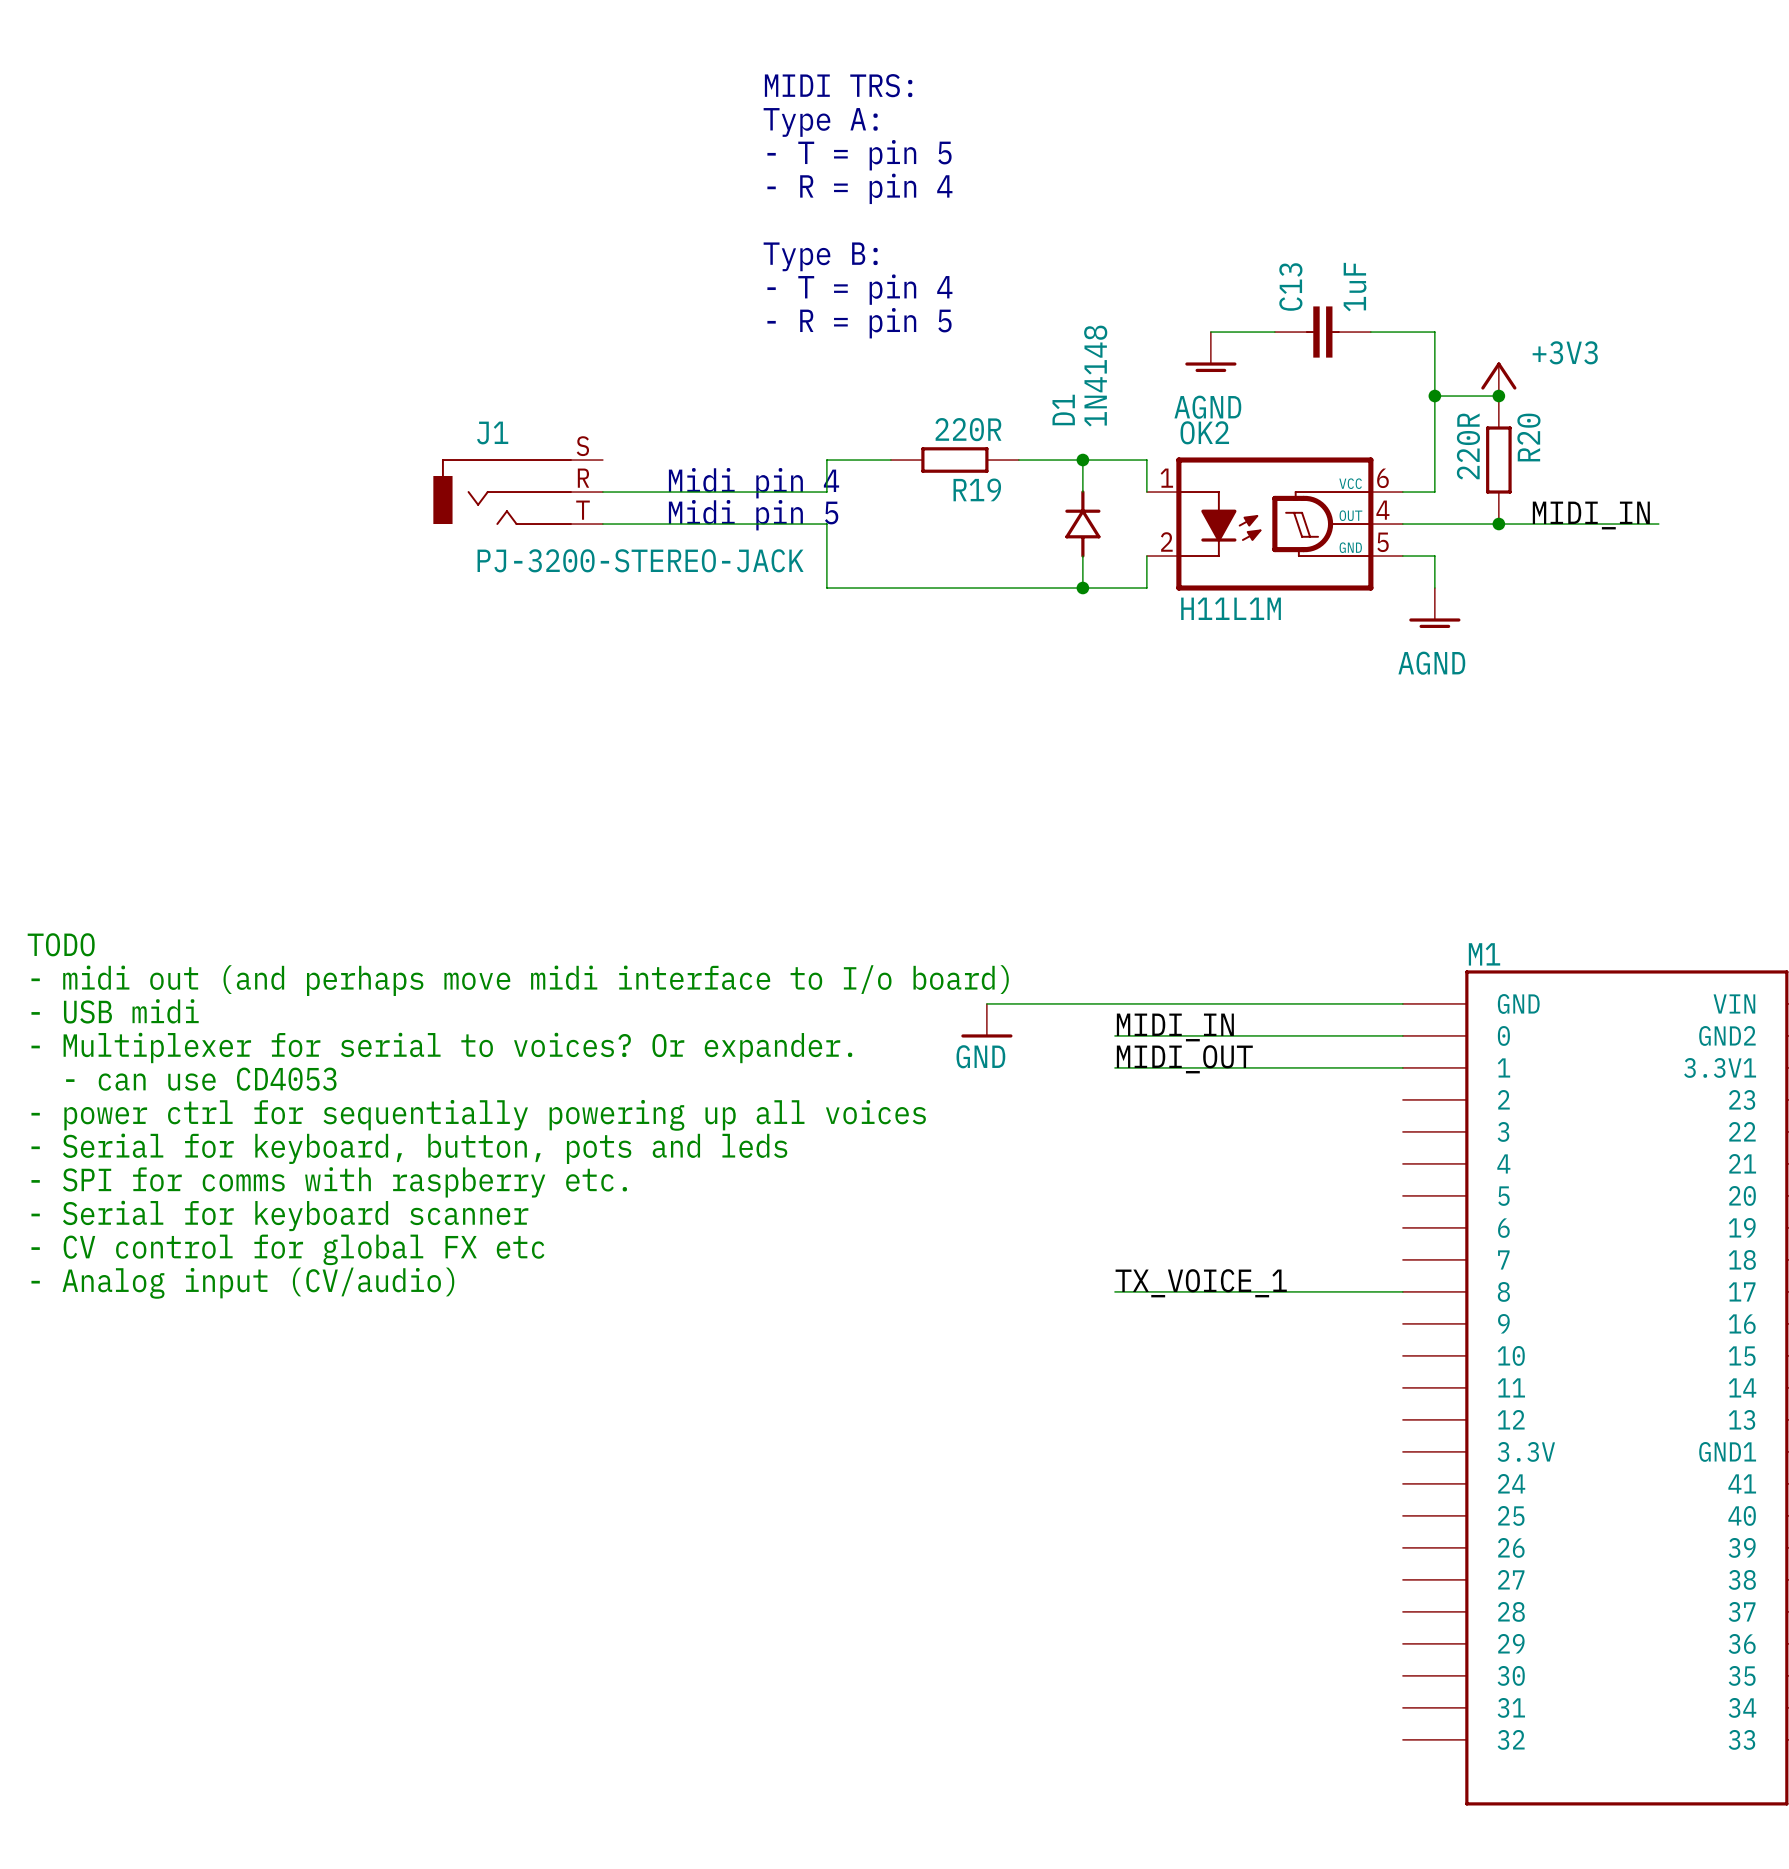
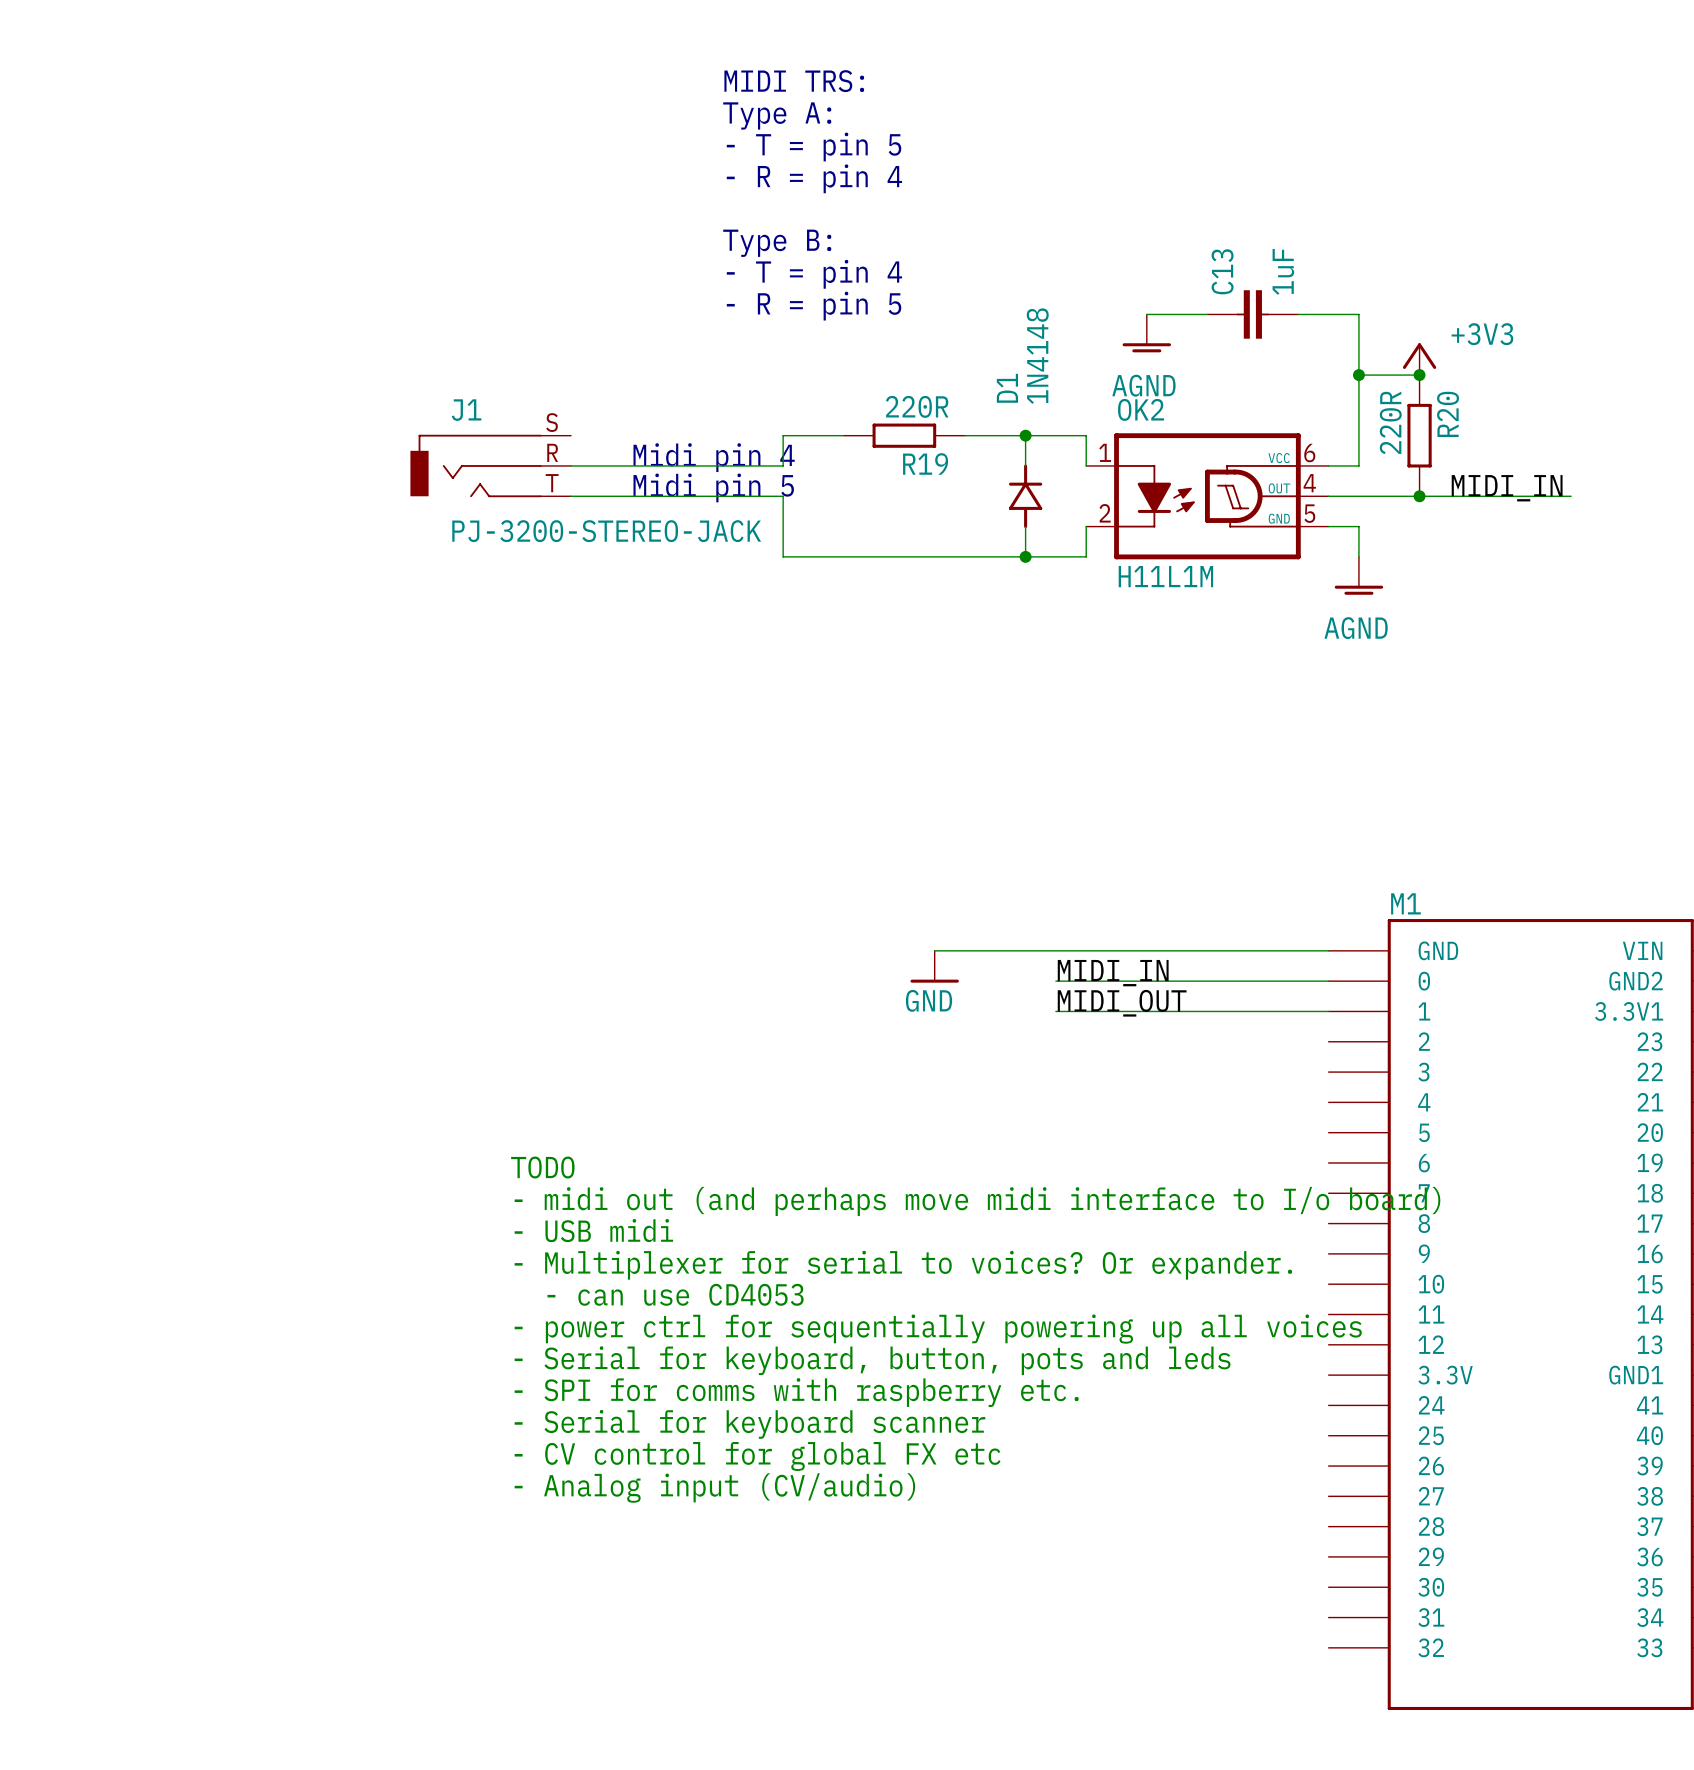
text: TODO (61, 944) -> none
text: - midi out (and perhaps move midi interface to I/o board) (520, 980) -> none
text: - USB midi (115, 1011) -> none
text: - Multiplexer for serial to voices? Or expander. (441, 1047) -> none
text: - can use CD4053 (201, 1079) -> none
text: - power ctrl for sequentially powering up all voices (478, 1115) -> none
text: - Serial for keyboard, button, pots and leds (409, 1148) -> none
text: - SPI for comms with raspberry etc. (329, 1182) -> none
text: - Serial for keyboard scanner (279, 1215) -> none
text: none -> TODO (542, 1167)
text: - CV control for global FX etc (287, 1249) -> none
text: none -> - midi out (and perhaps move midi interface to I/o board) (977, 1201)
text: - Analog input (CV/audio) (242, 1283) -> none
label: TX_VOICE_1 (1201, 1283) -> none
wire: (1114, 1291) (1402, 1291) -> none
text: none -> - USB midi (593, 1230)
text: none -> - Multiplexer for serial to voices? Or expander. (903, 1265)
text: none -> - can use CD4053 (675, 1294)
text: none -> - power ctrl for sequentially powering up all voices (938, 1329)
text: none -> - Serial for keyboard, button, pots and leds (872, 1360)
text: none -> - SPI for comms with raspberry etc. (796, 1392)
text: none -> - Serial for keyboard scanner (749, 1424)
text: none -> - CV control for global FX etc (757, 1456)
text: none -> - Analog input (CV/audio) (714, 1488)

